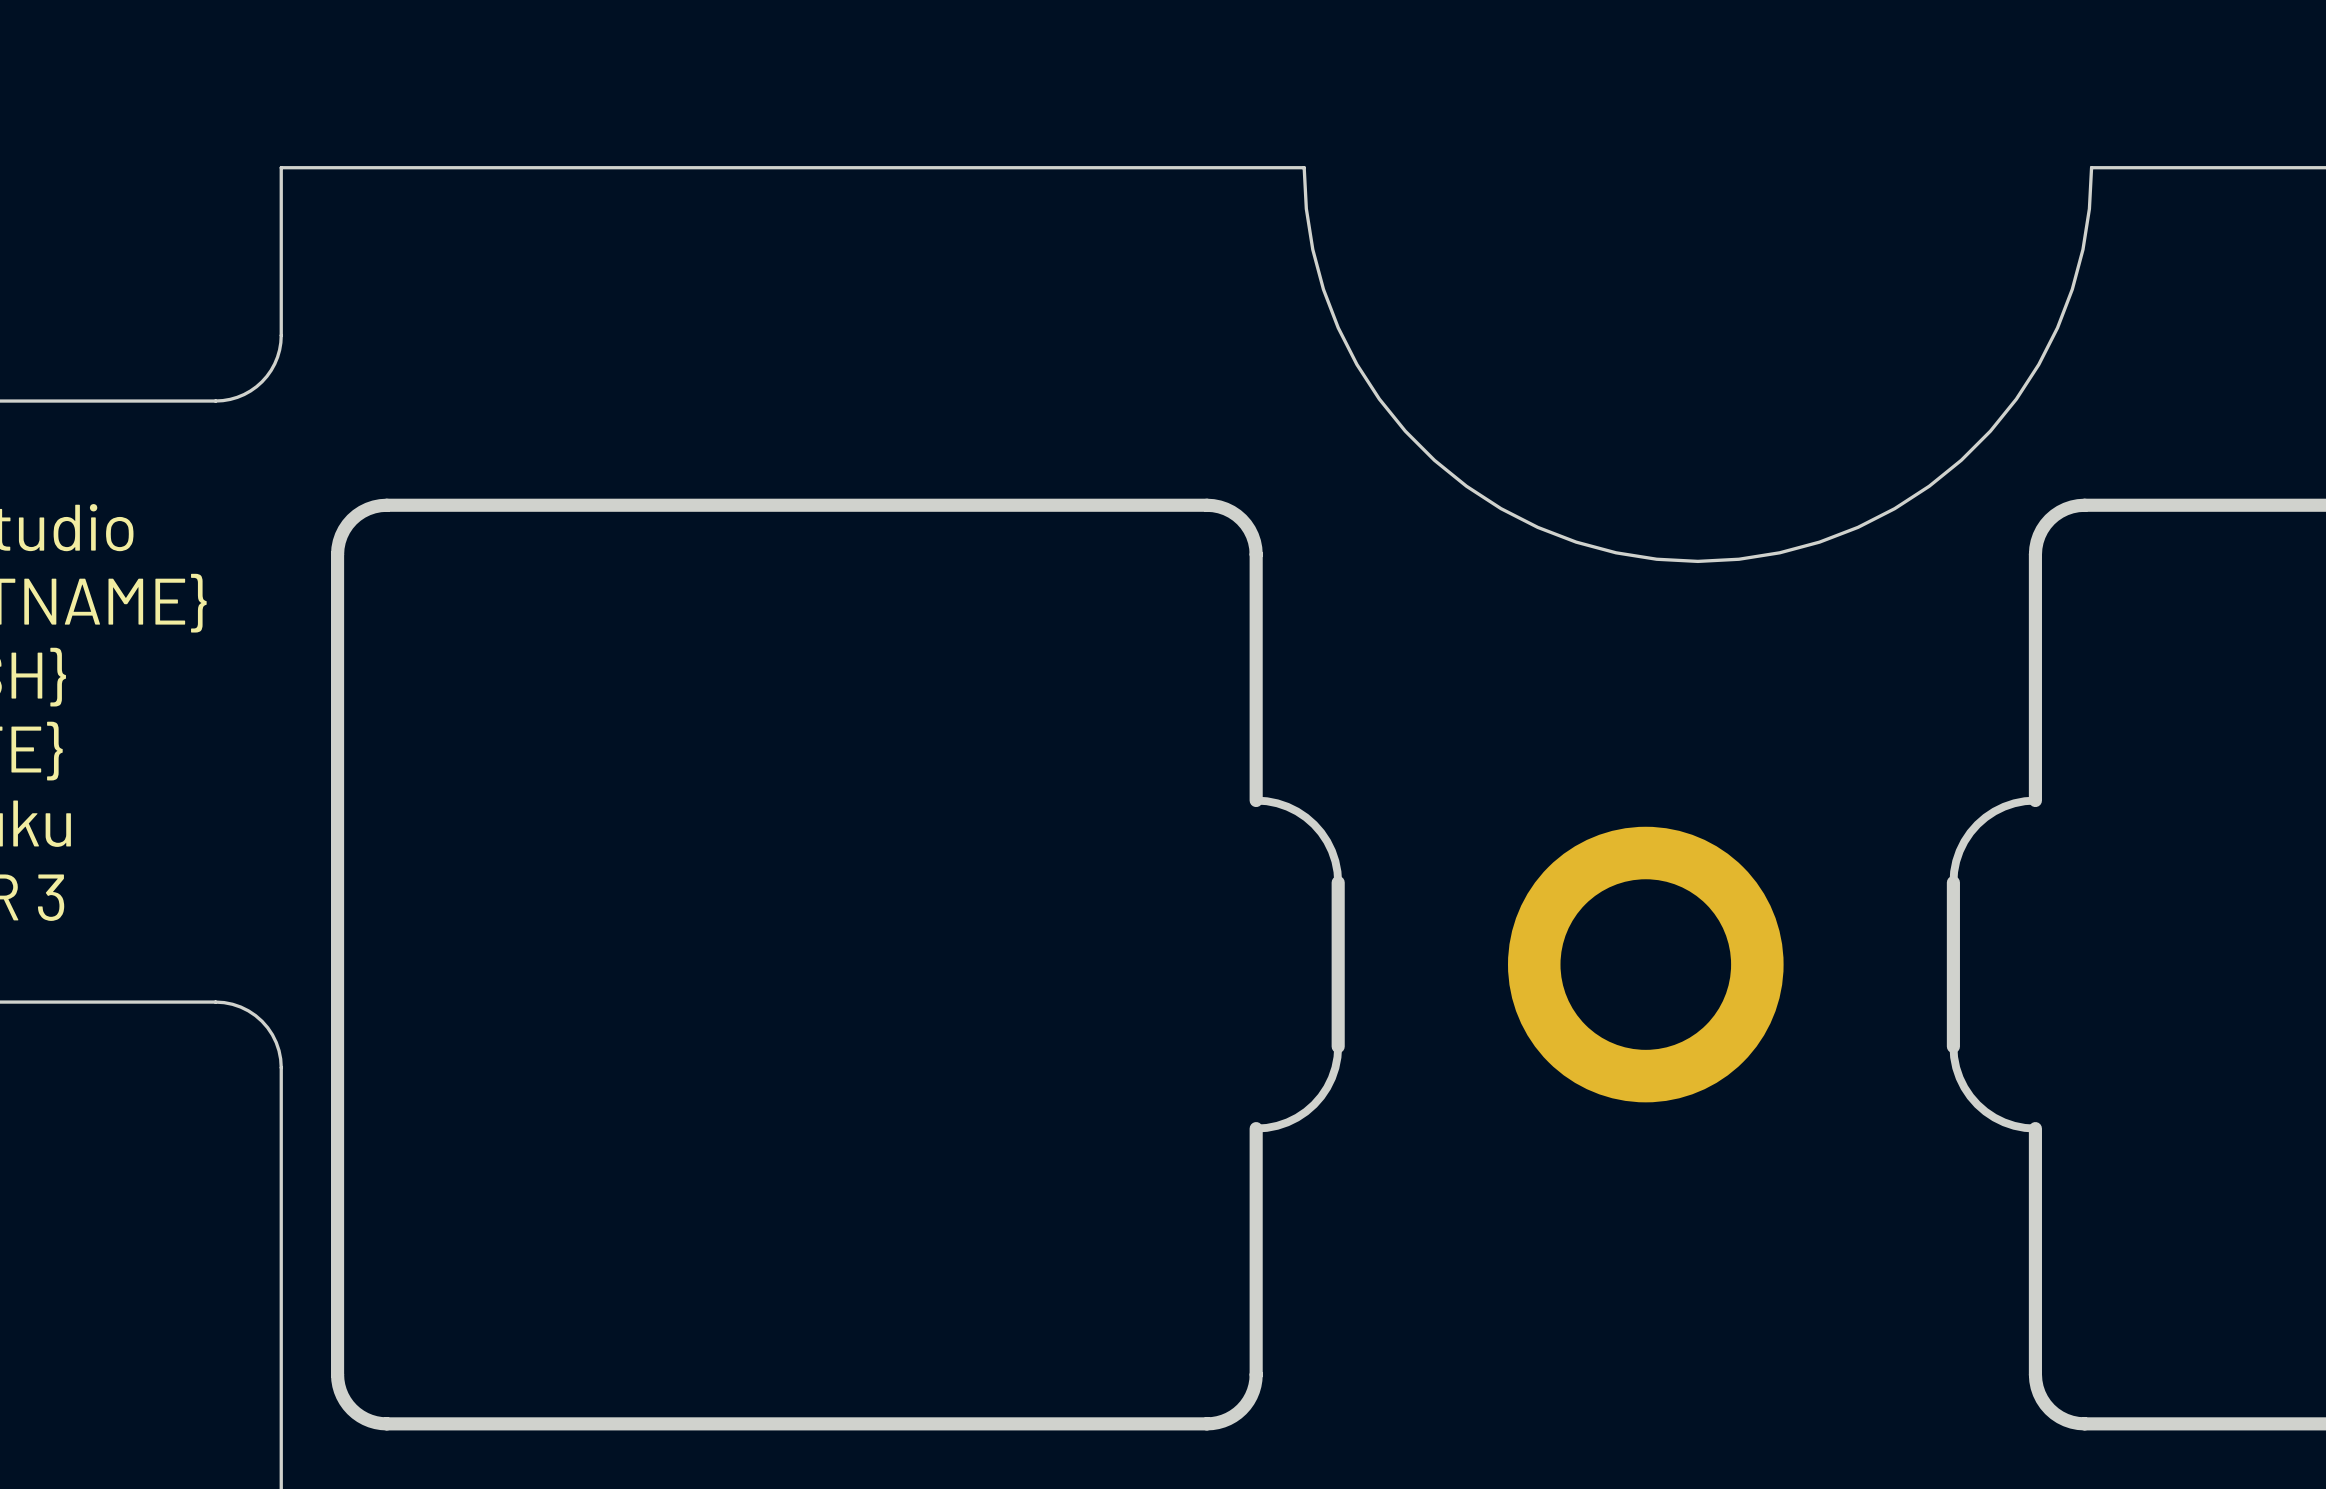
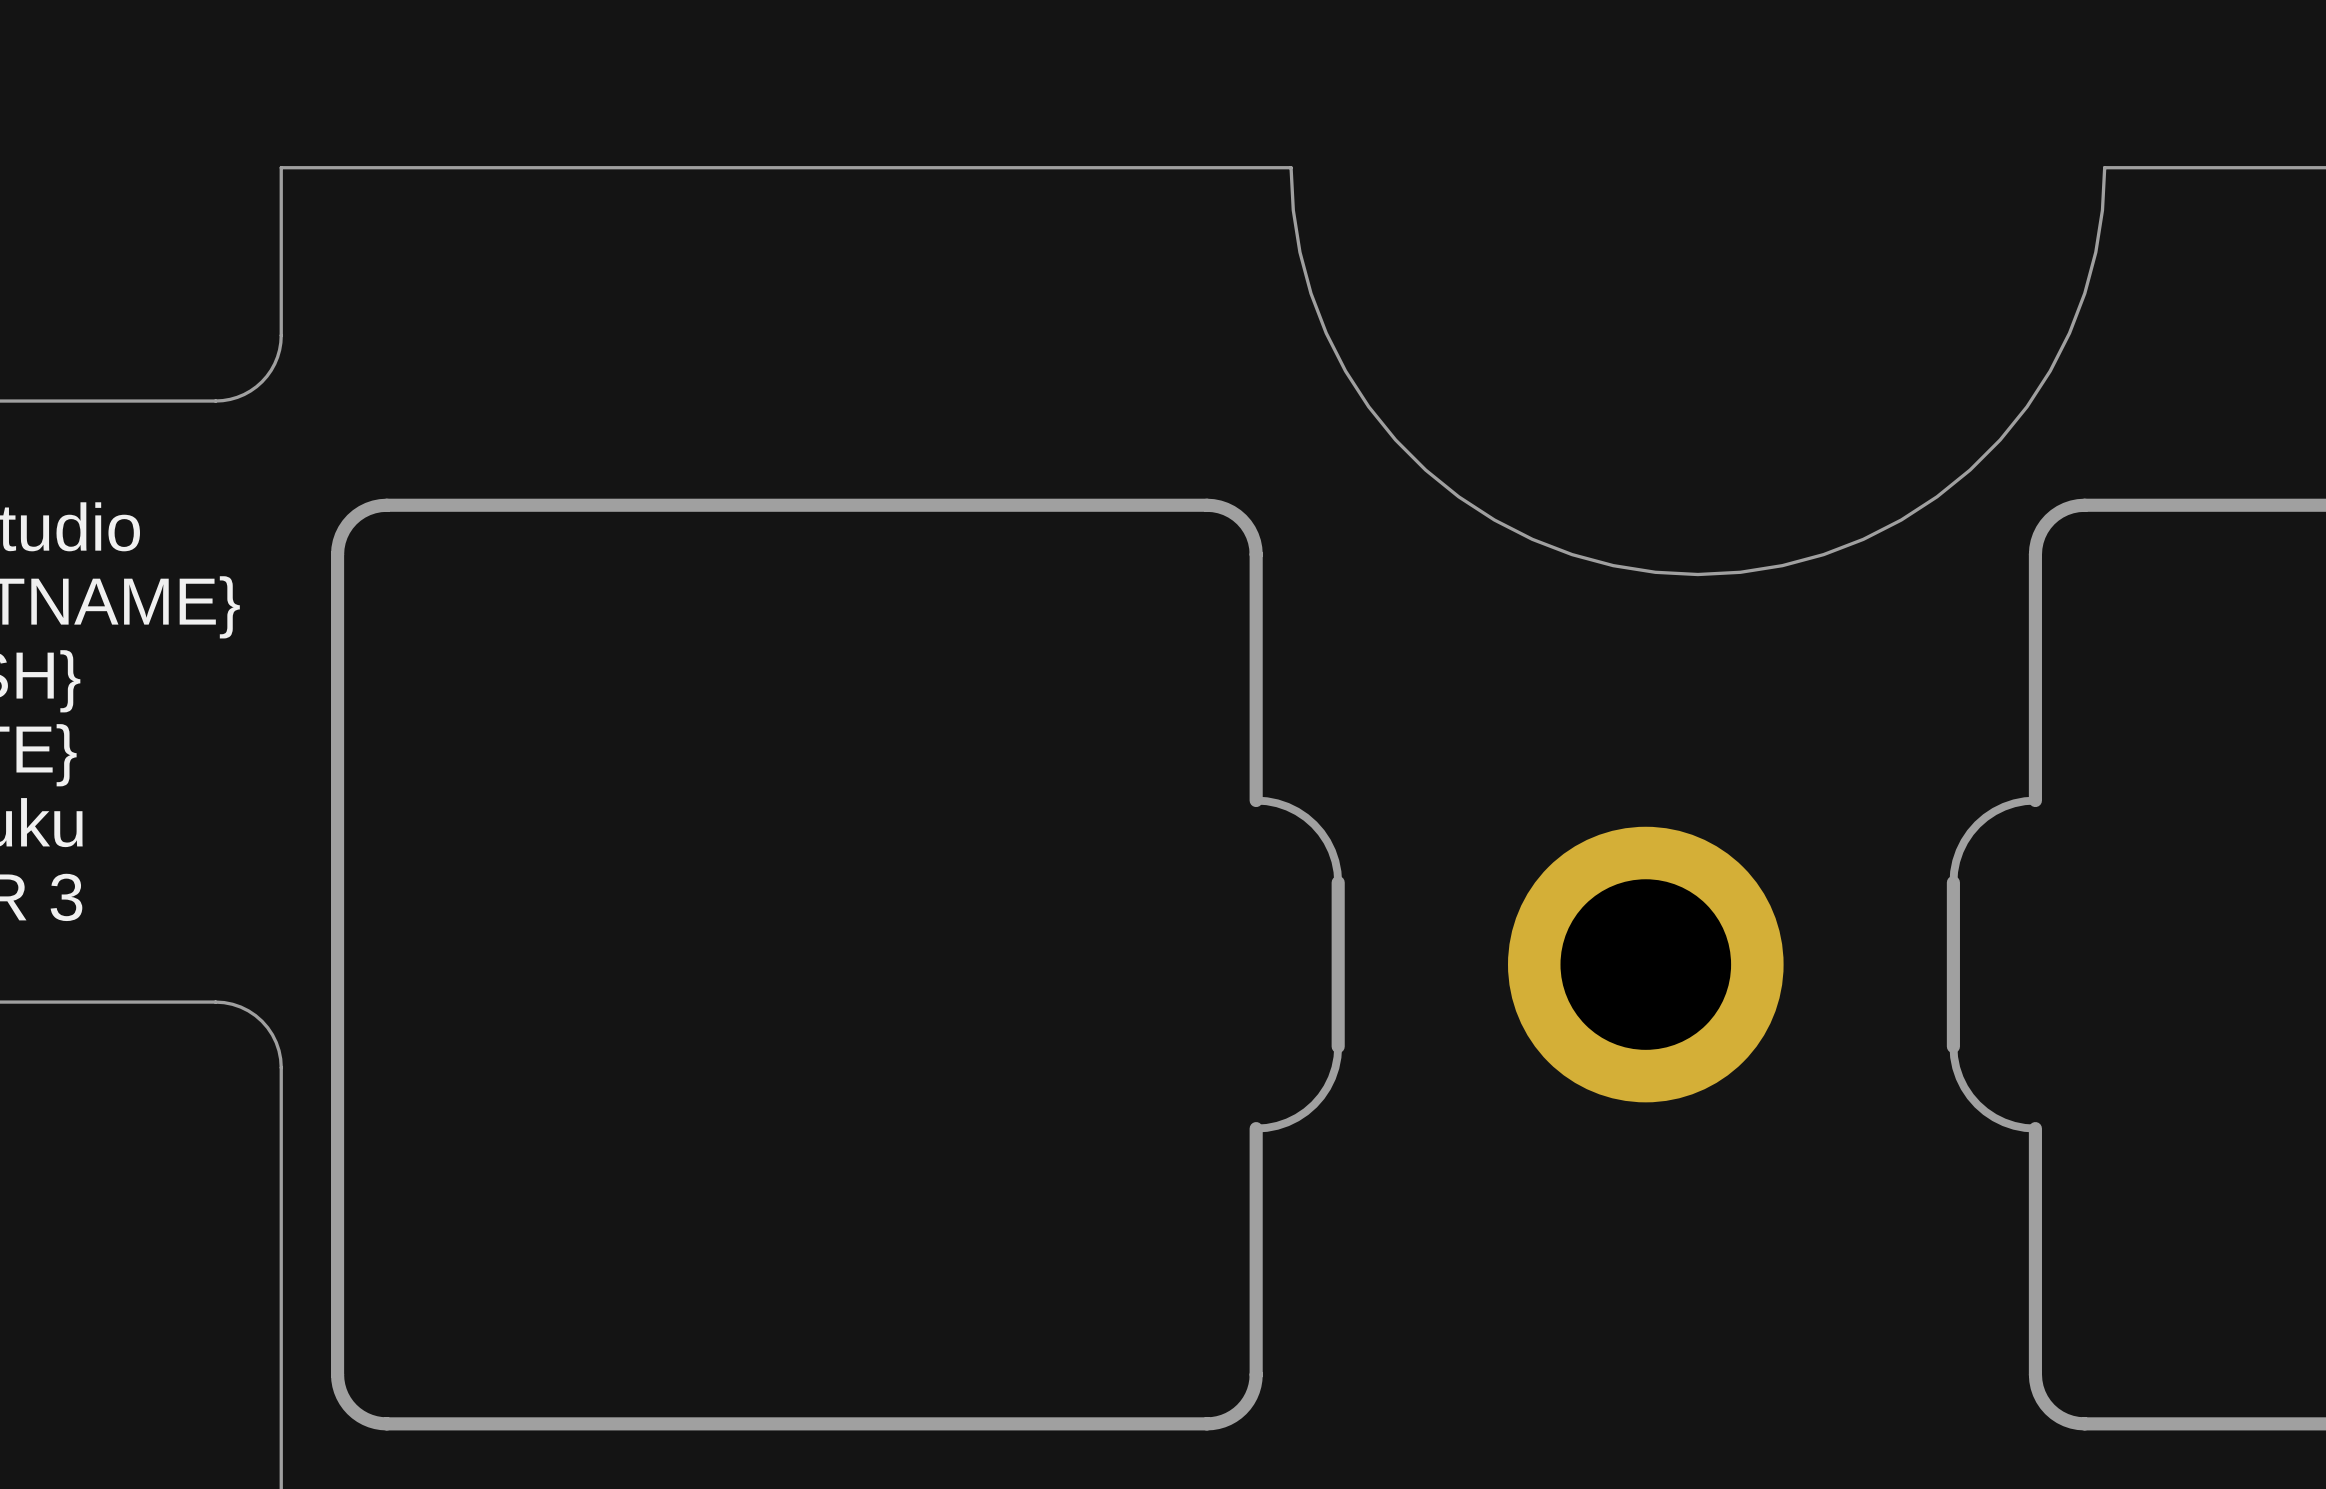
board edge: (1291, 167) (1304, 167) (1306, 208) (1312, 249) (1323, 289) (1338, 327) (1356, 364) (1379, 399) (1405, 431) (1434, 460) (1466, 486) (1501, 508) (1537, 527) (1576, 542) (1616, 552) (1656, 559) (1697, 561) (1739, 559) (1779, 552) (1819, 542) (1858, 527) (1894, 508) (1929, 486) (1961, 460) (1990, 431) (2016, 399) (2038, 364) (2057, 327) (2072, 289) (2082, 249) (2089, 208) (2091, 167) (2104, 167) -> (1291, 167) (1293, 210) (1299, 252) (1310, 293) (1326, 333) (1345, 371) (1368, 406) (1395, 439) (1425, 470) (1458, 496) (1494, 520) (1532, 539) (1572, 554) (1613, 565) (1655, 572) (1697, 574) (1740, 572) (1782, 565) (1823, 554) (1863, 539) (1901, 520) (1937, 496) (1970, 470) (2000, 439) (2027, 406) (2050, 371) (2069, 333) (2084, 293) (2095, 252) (2102, 210) (2104, 167)

